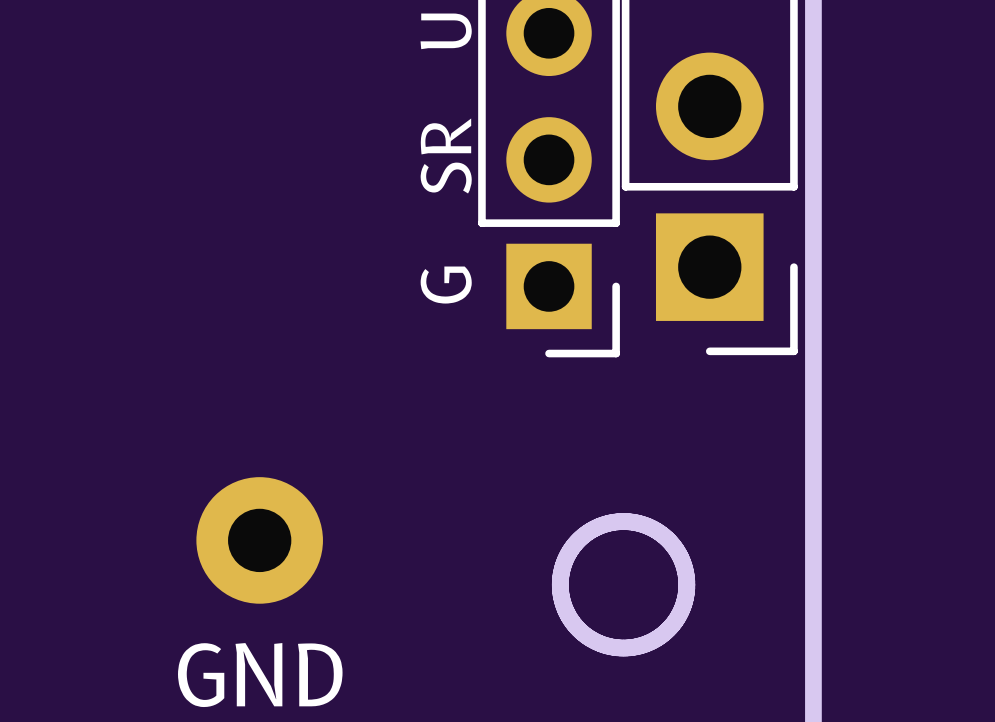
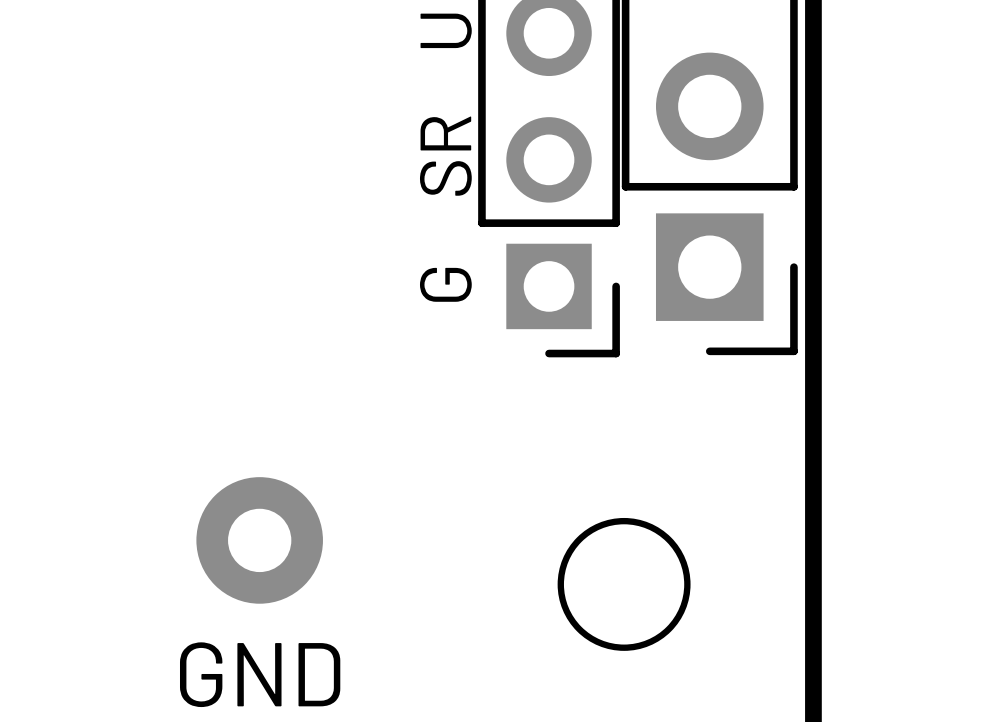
round board edge: none -> [557, 517, 691, 651]
board edge: (630, 521) (653, 529) (672, 544) (684, 565) (686, 591) (679, 614) (663, 633) (642, 645) (617, 647) (593, 640) (574, 625) (563, 603) (560, 578) (567, 554) (583, 535) (604, 524) (630, 521) -> none

